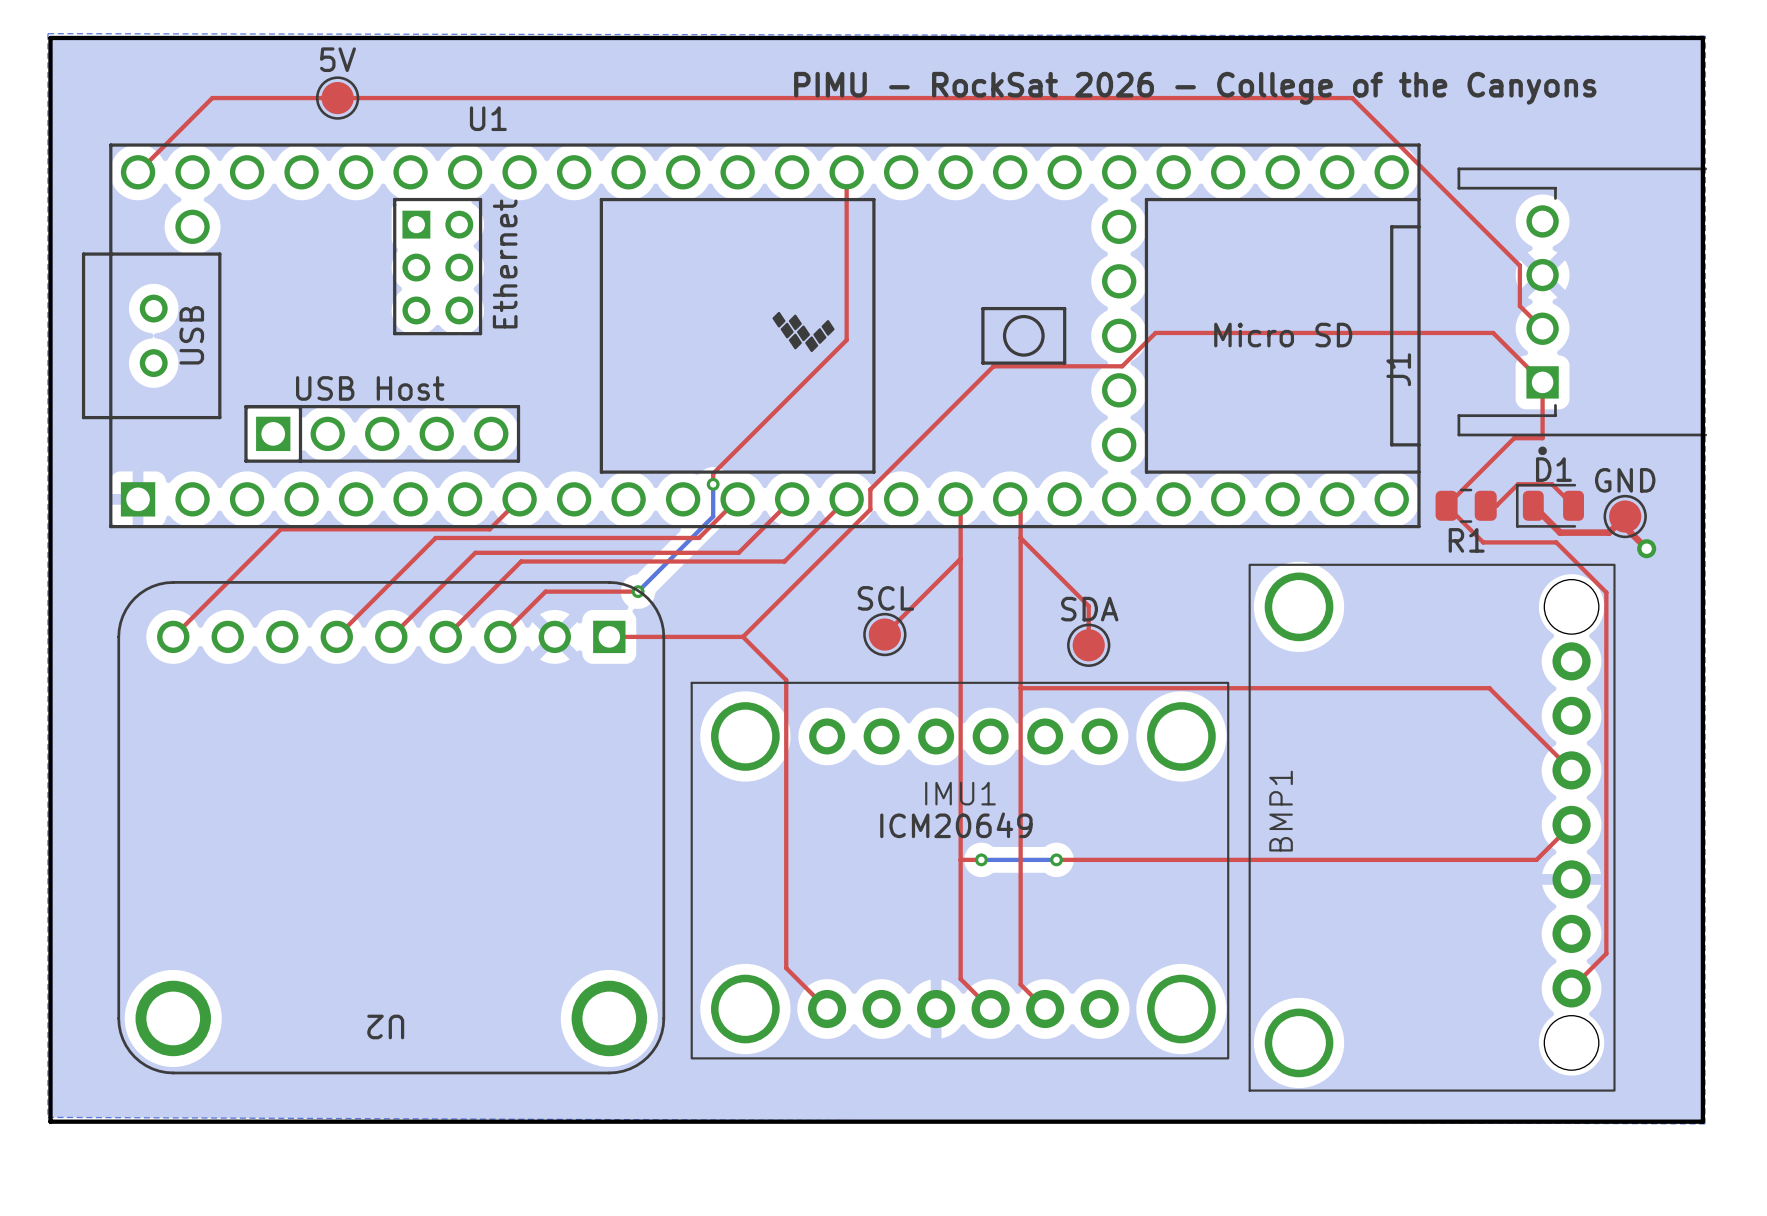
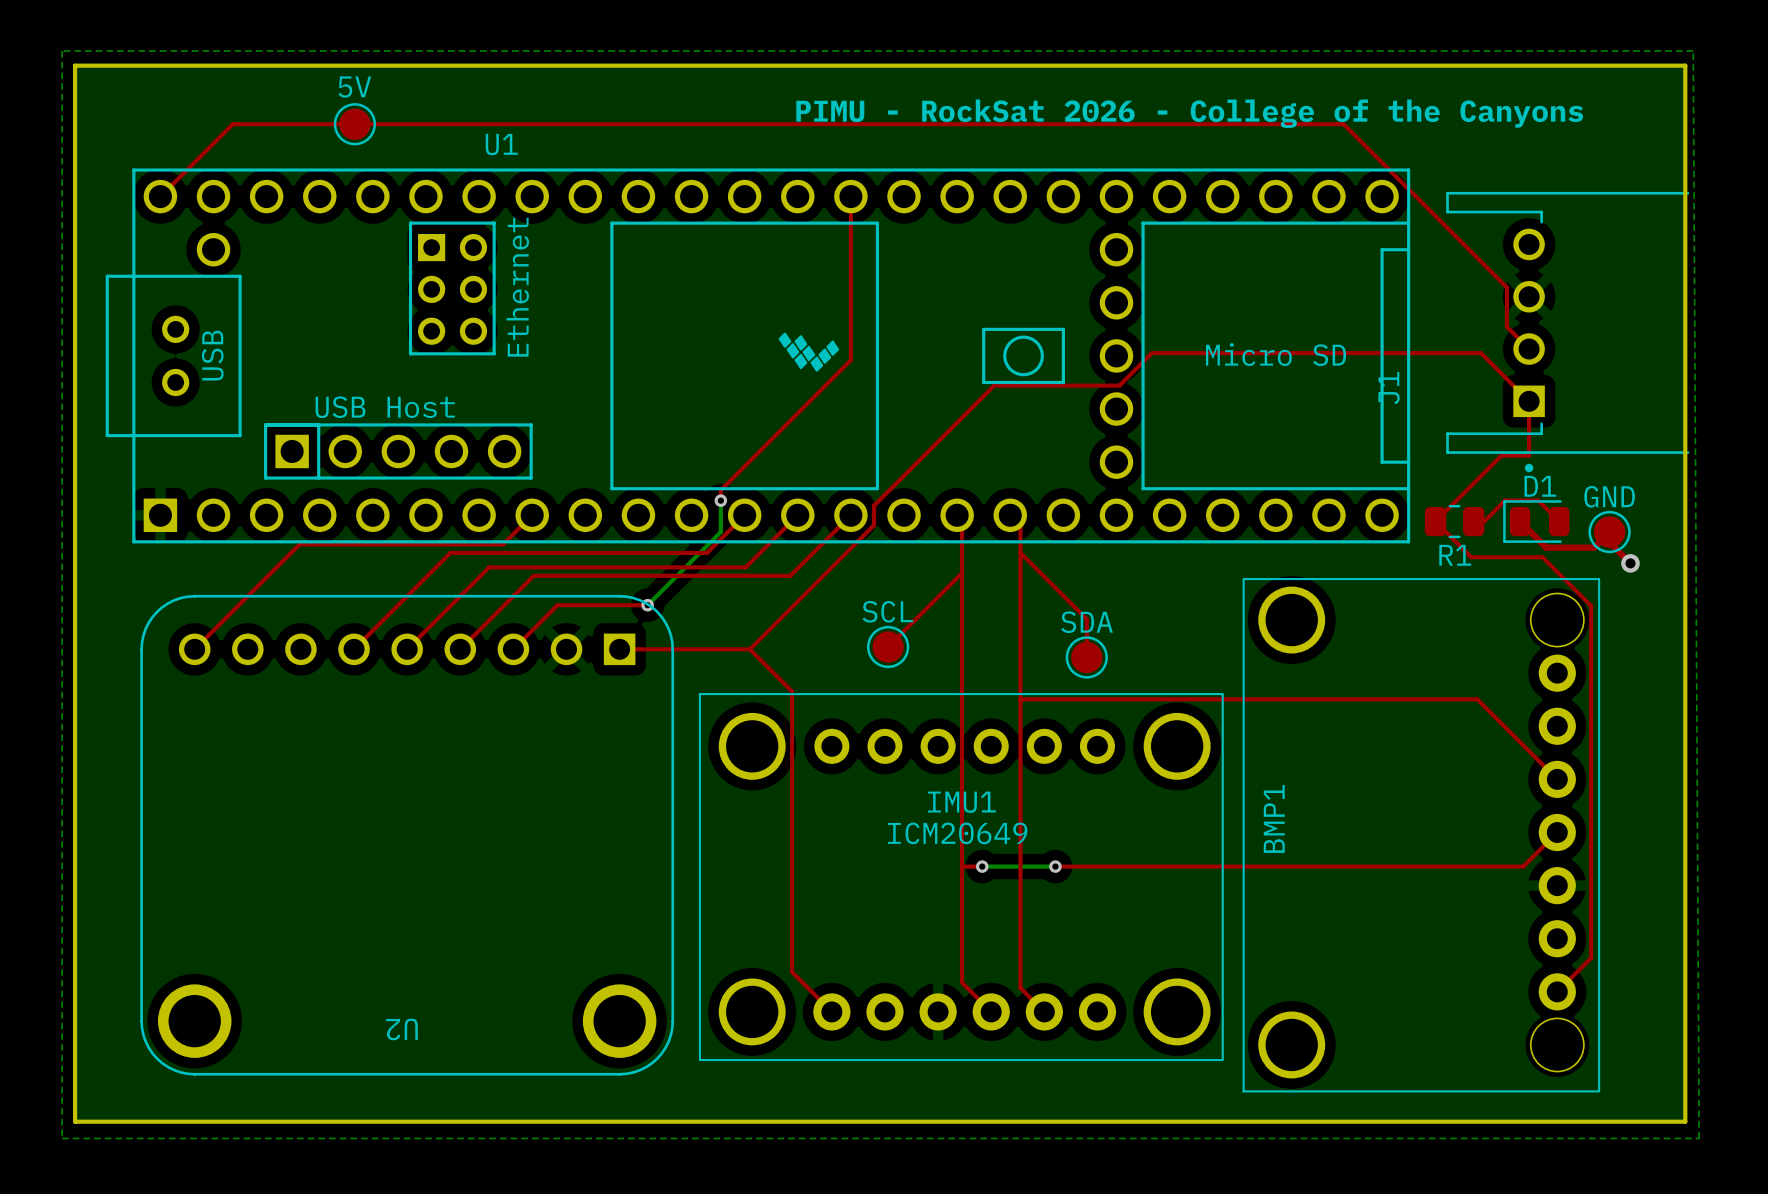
bottom zone outline: (47, 33) (47, 1117) (1704, 1123) (1705, 36) (47, 33) -> (62, 51) (62, 1138) (1699, 1138) (1693, 51) (62, 51)

